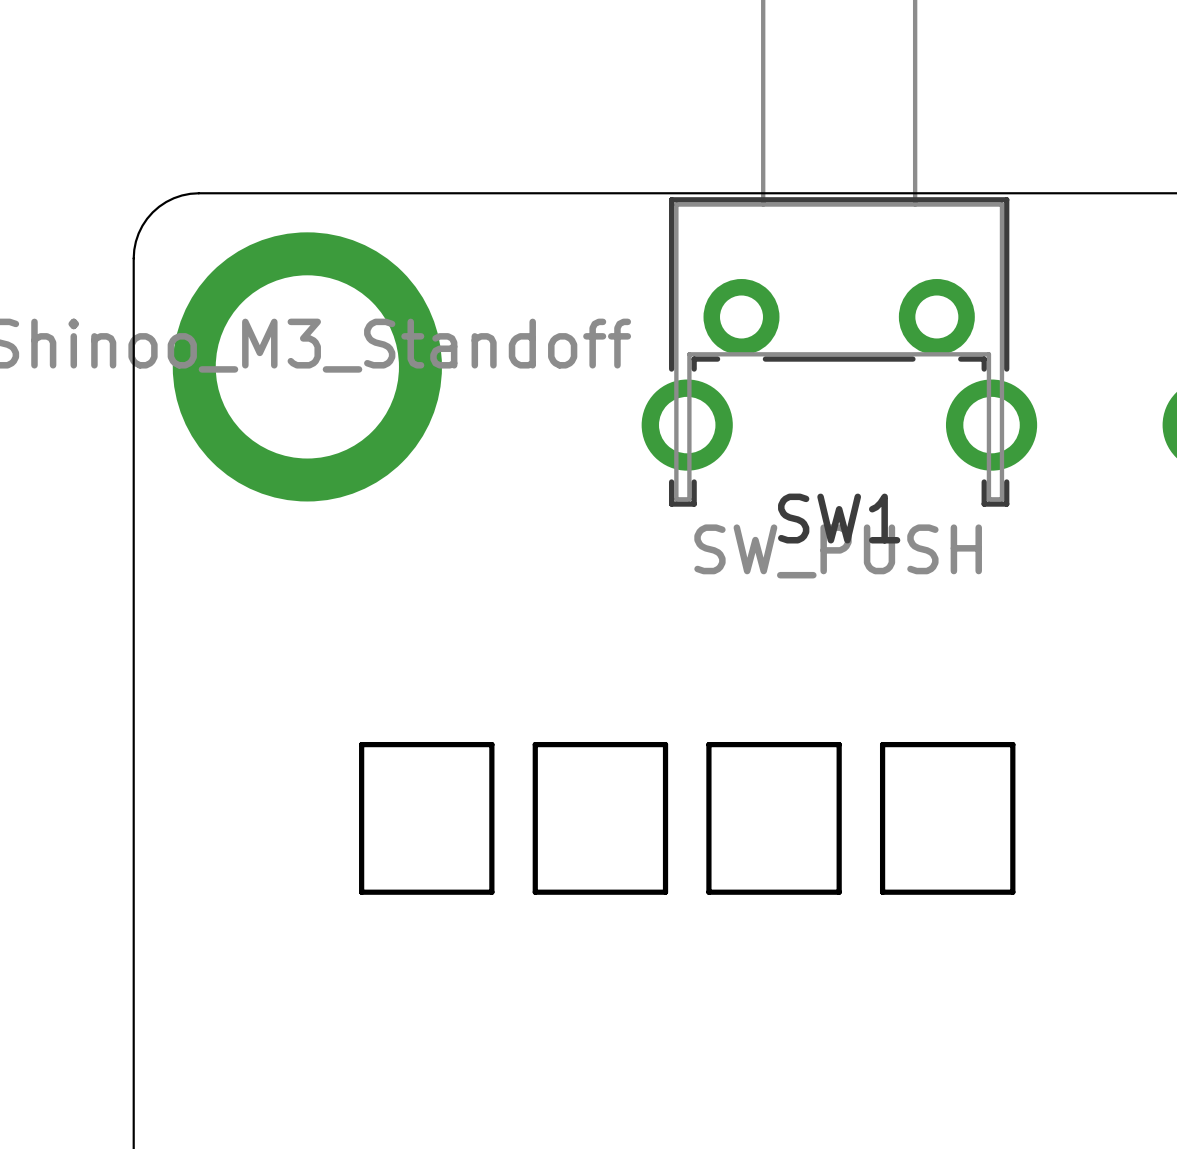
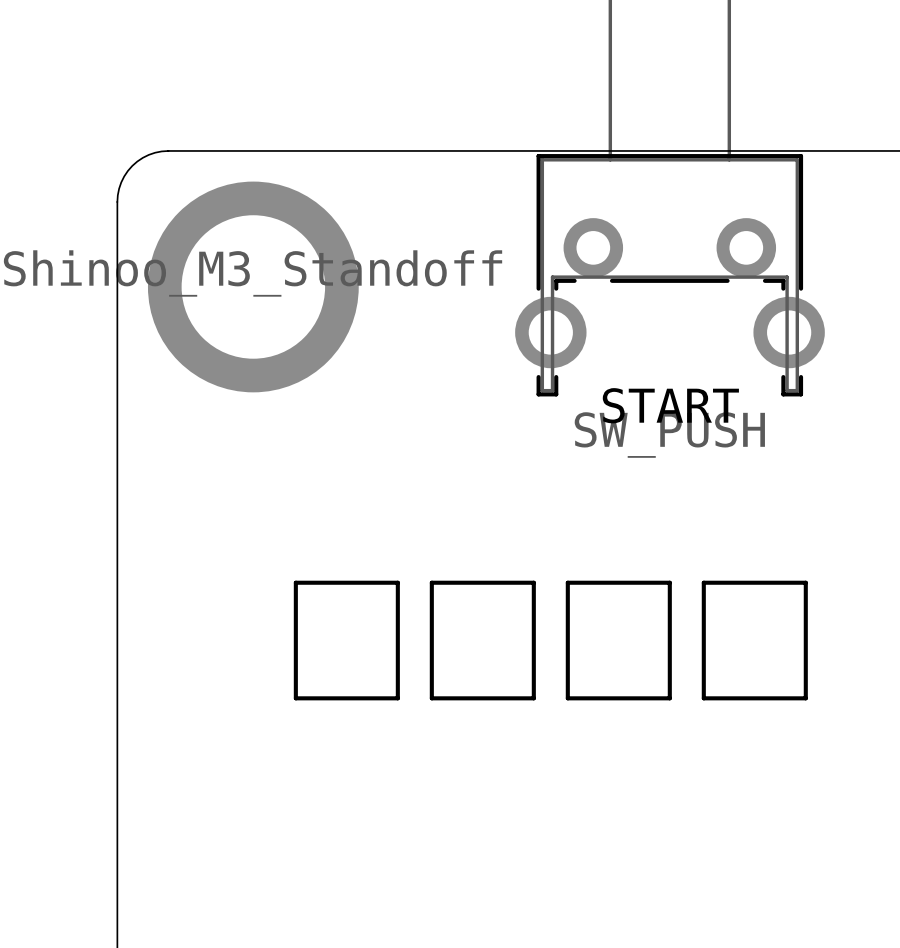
SW1 name: SW1 (839, 518) -> START (670, 405)

